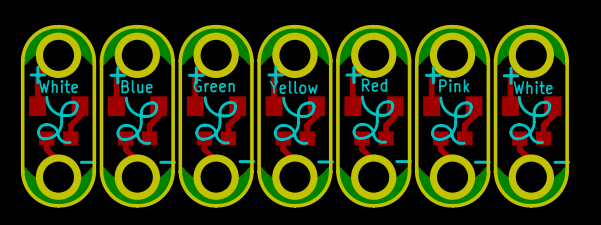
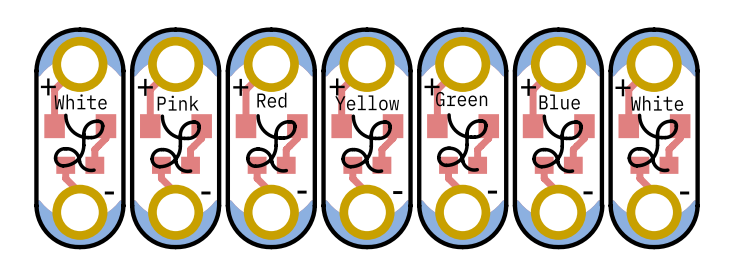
text position: Green (214, 85) -> Green (461, 99)
text position: Red (374, 85) -> Red (271, 100)
text: Pink (454, 85) -> Blue (559, 102)
text: Blue (137, 86) -> Pink (178, 103)

